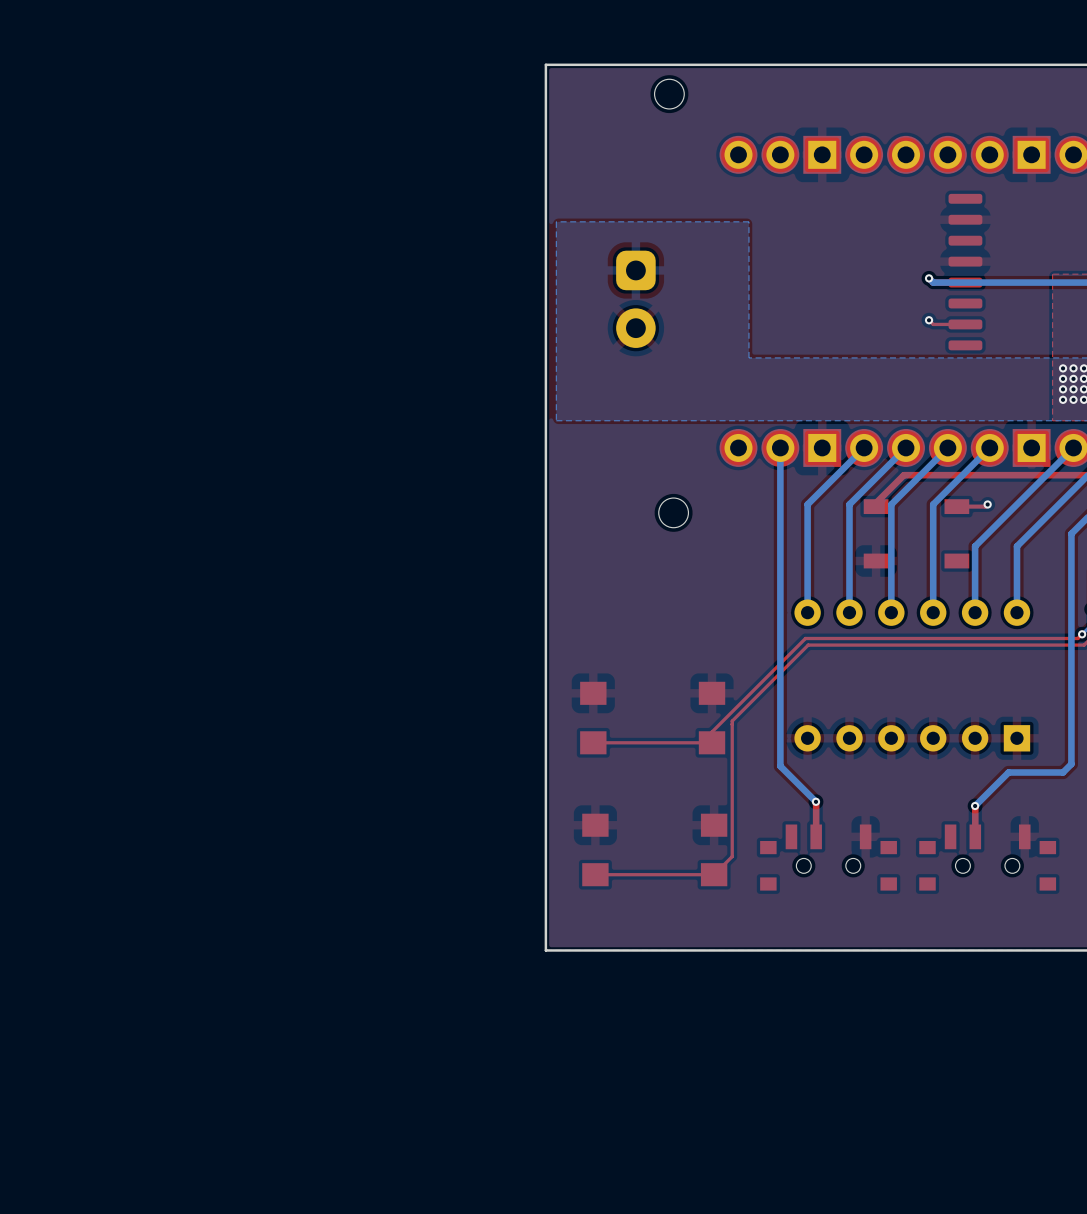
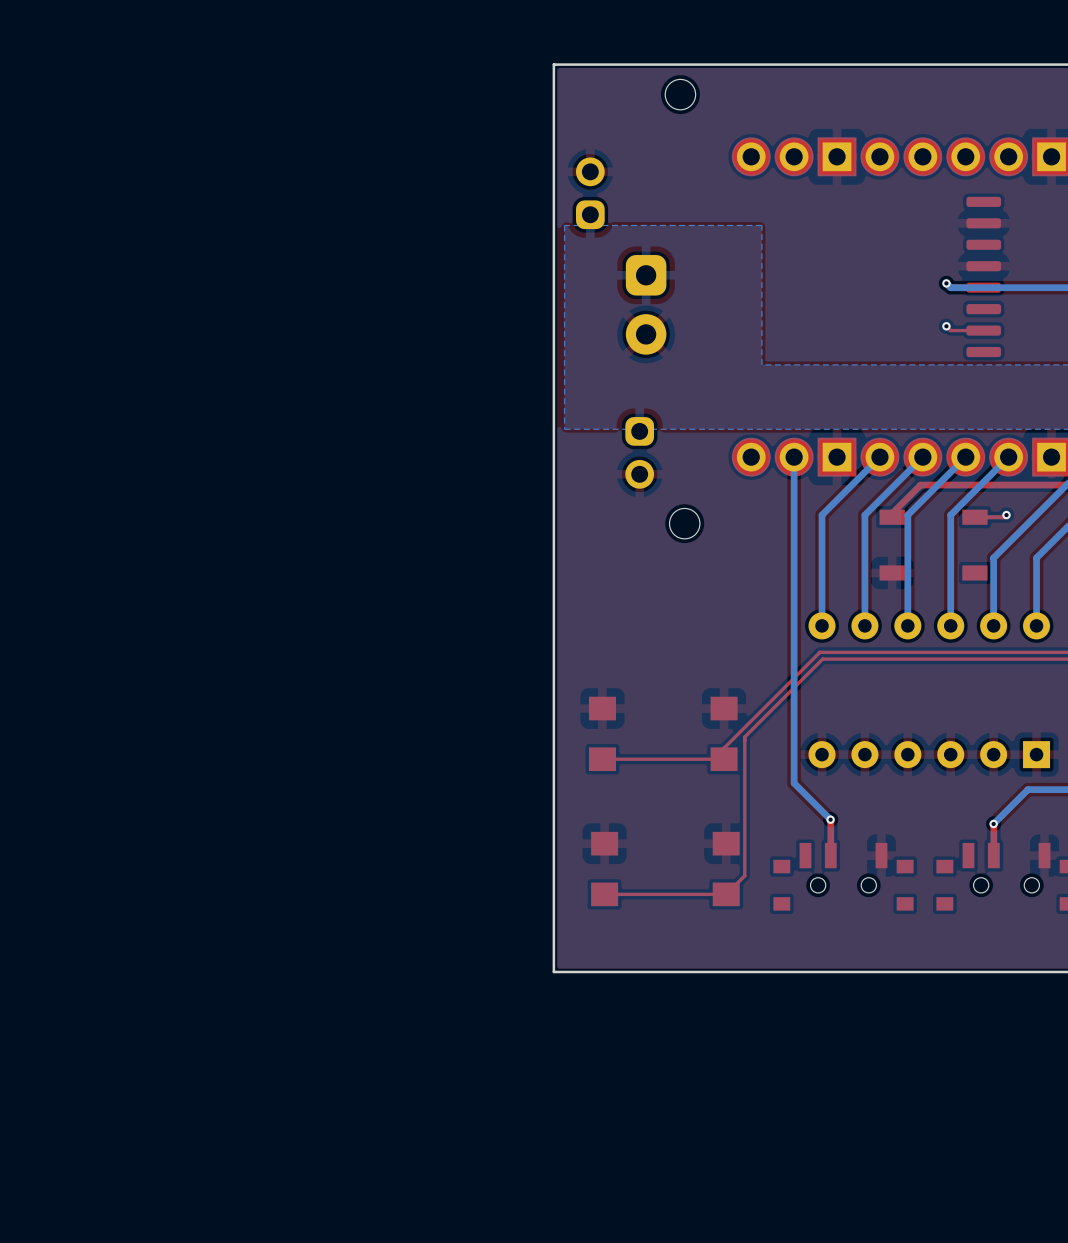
part: none -> (590, 193)
part: none -> (639, 452)

